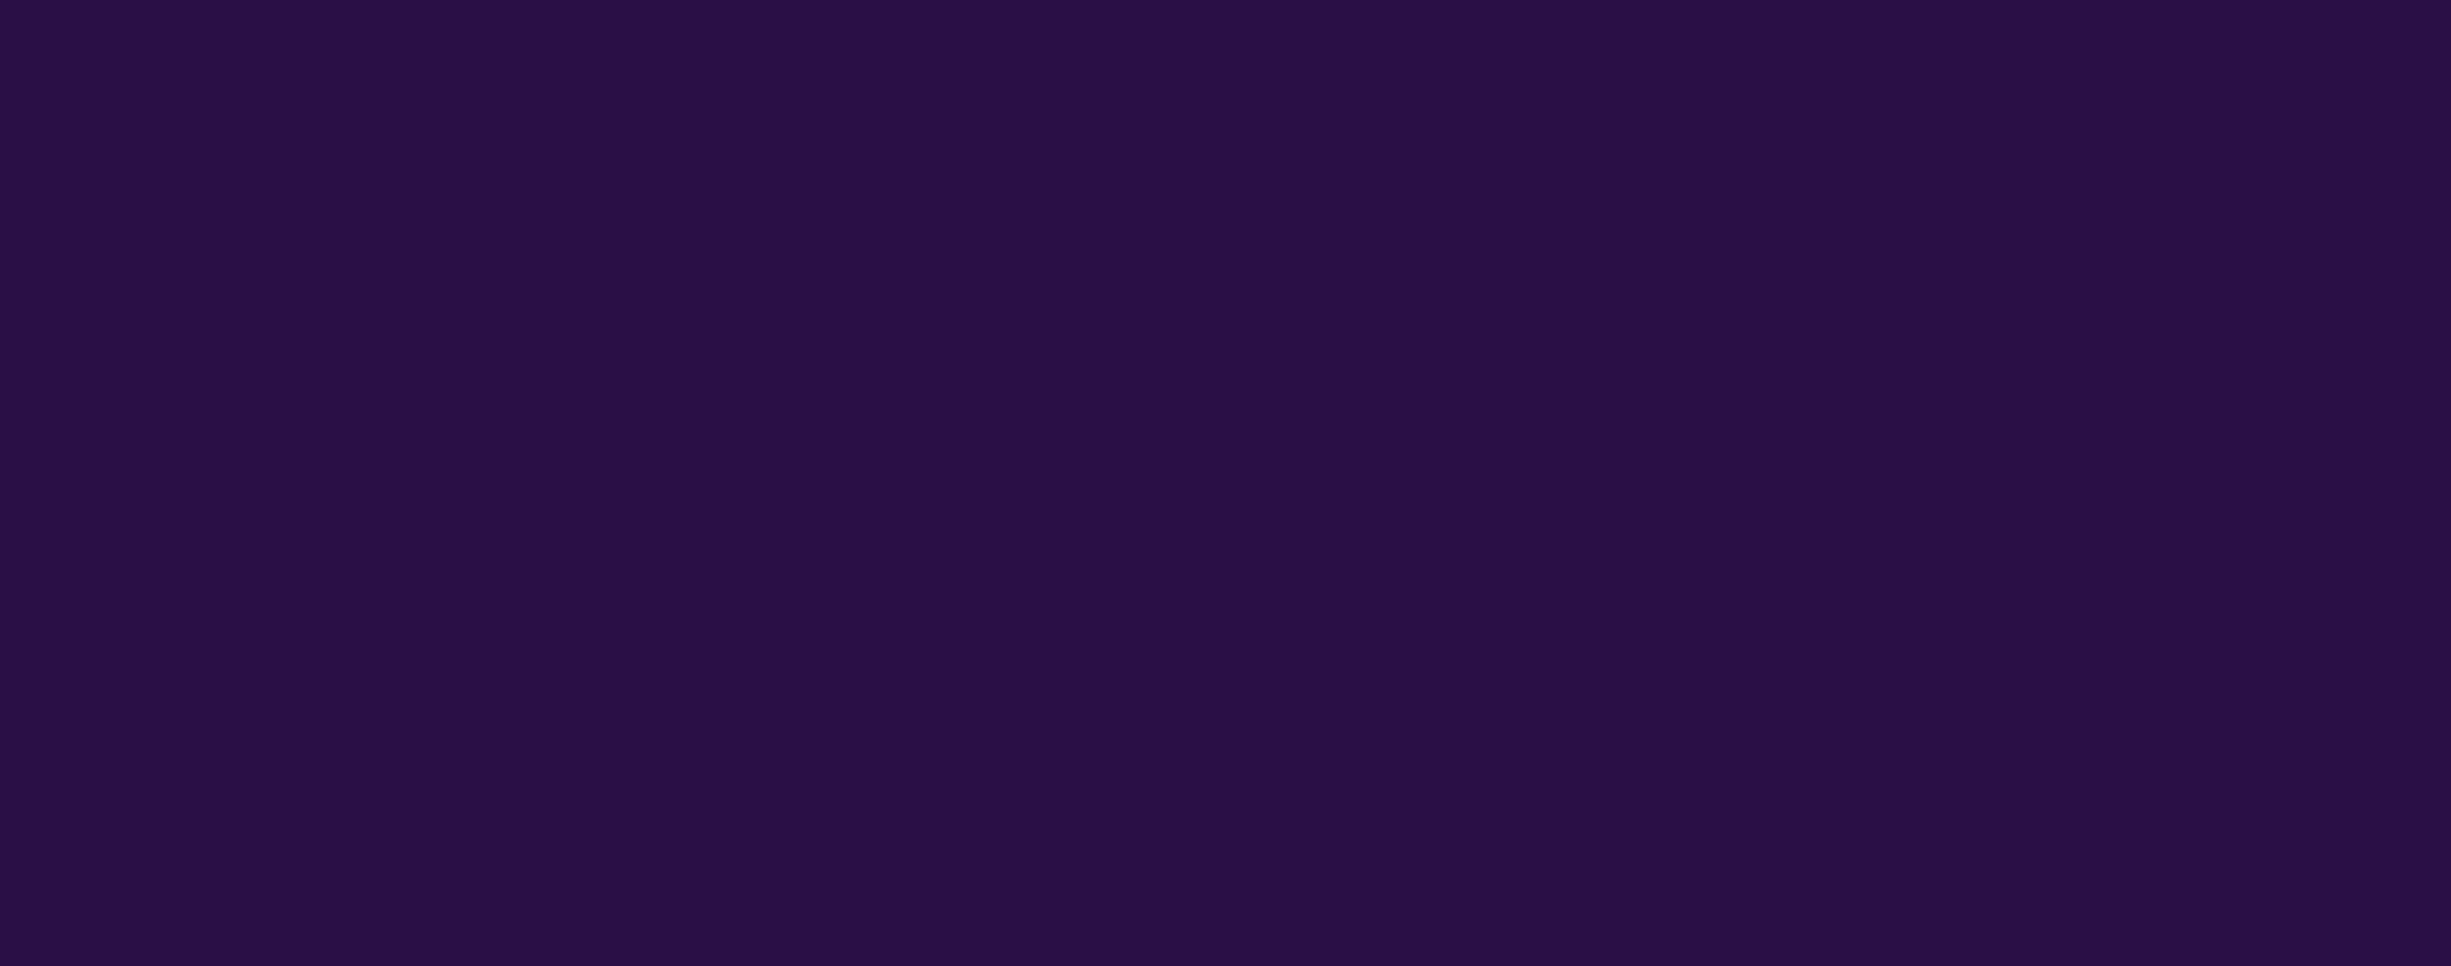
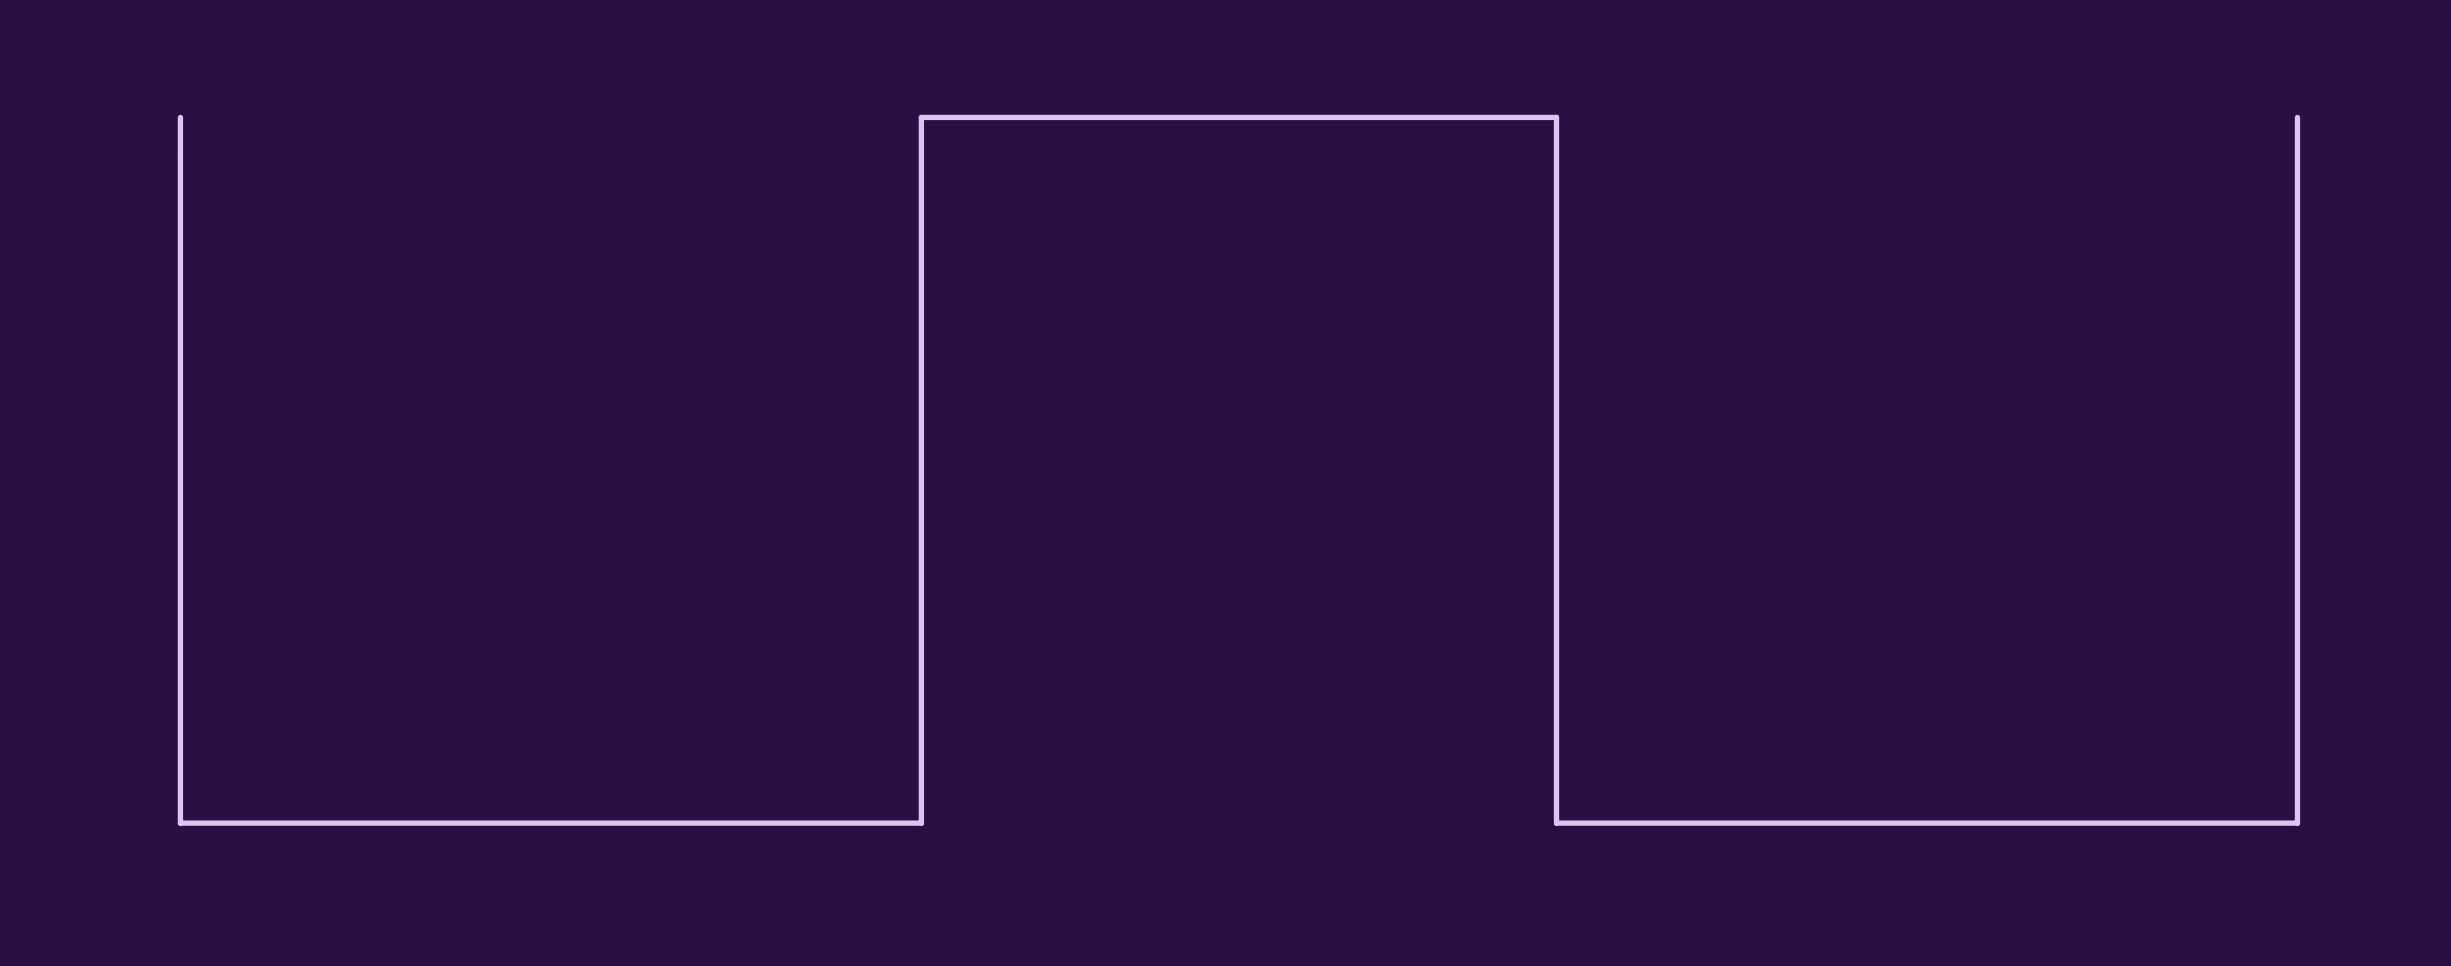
board edge: none -> (2297, 117) (2297, 823) (1556, 823) (1556, 117) (921, 117) (921, 823) (180, 823) (180, 117)

